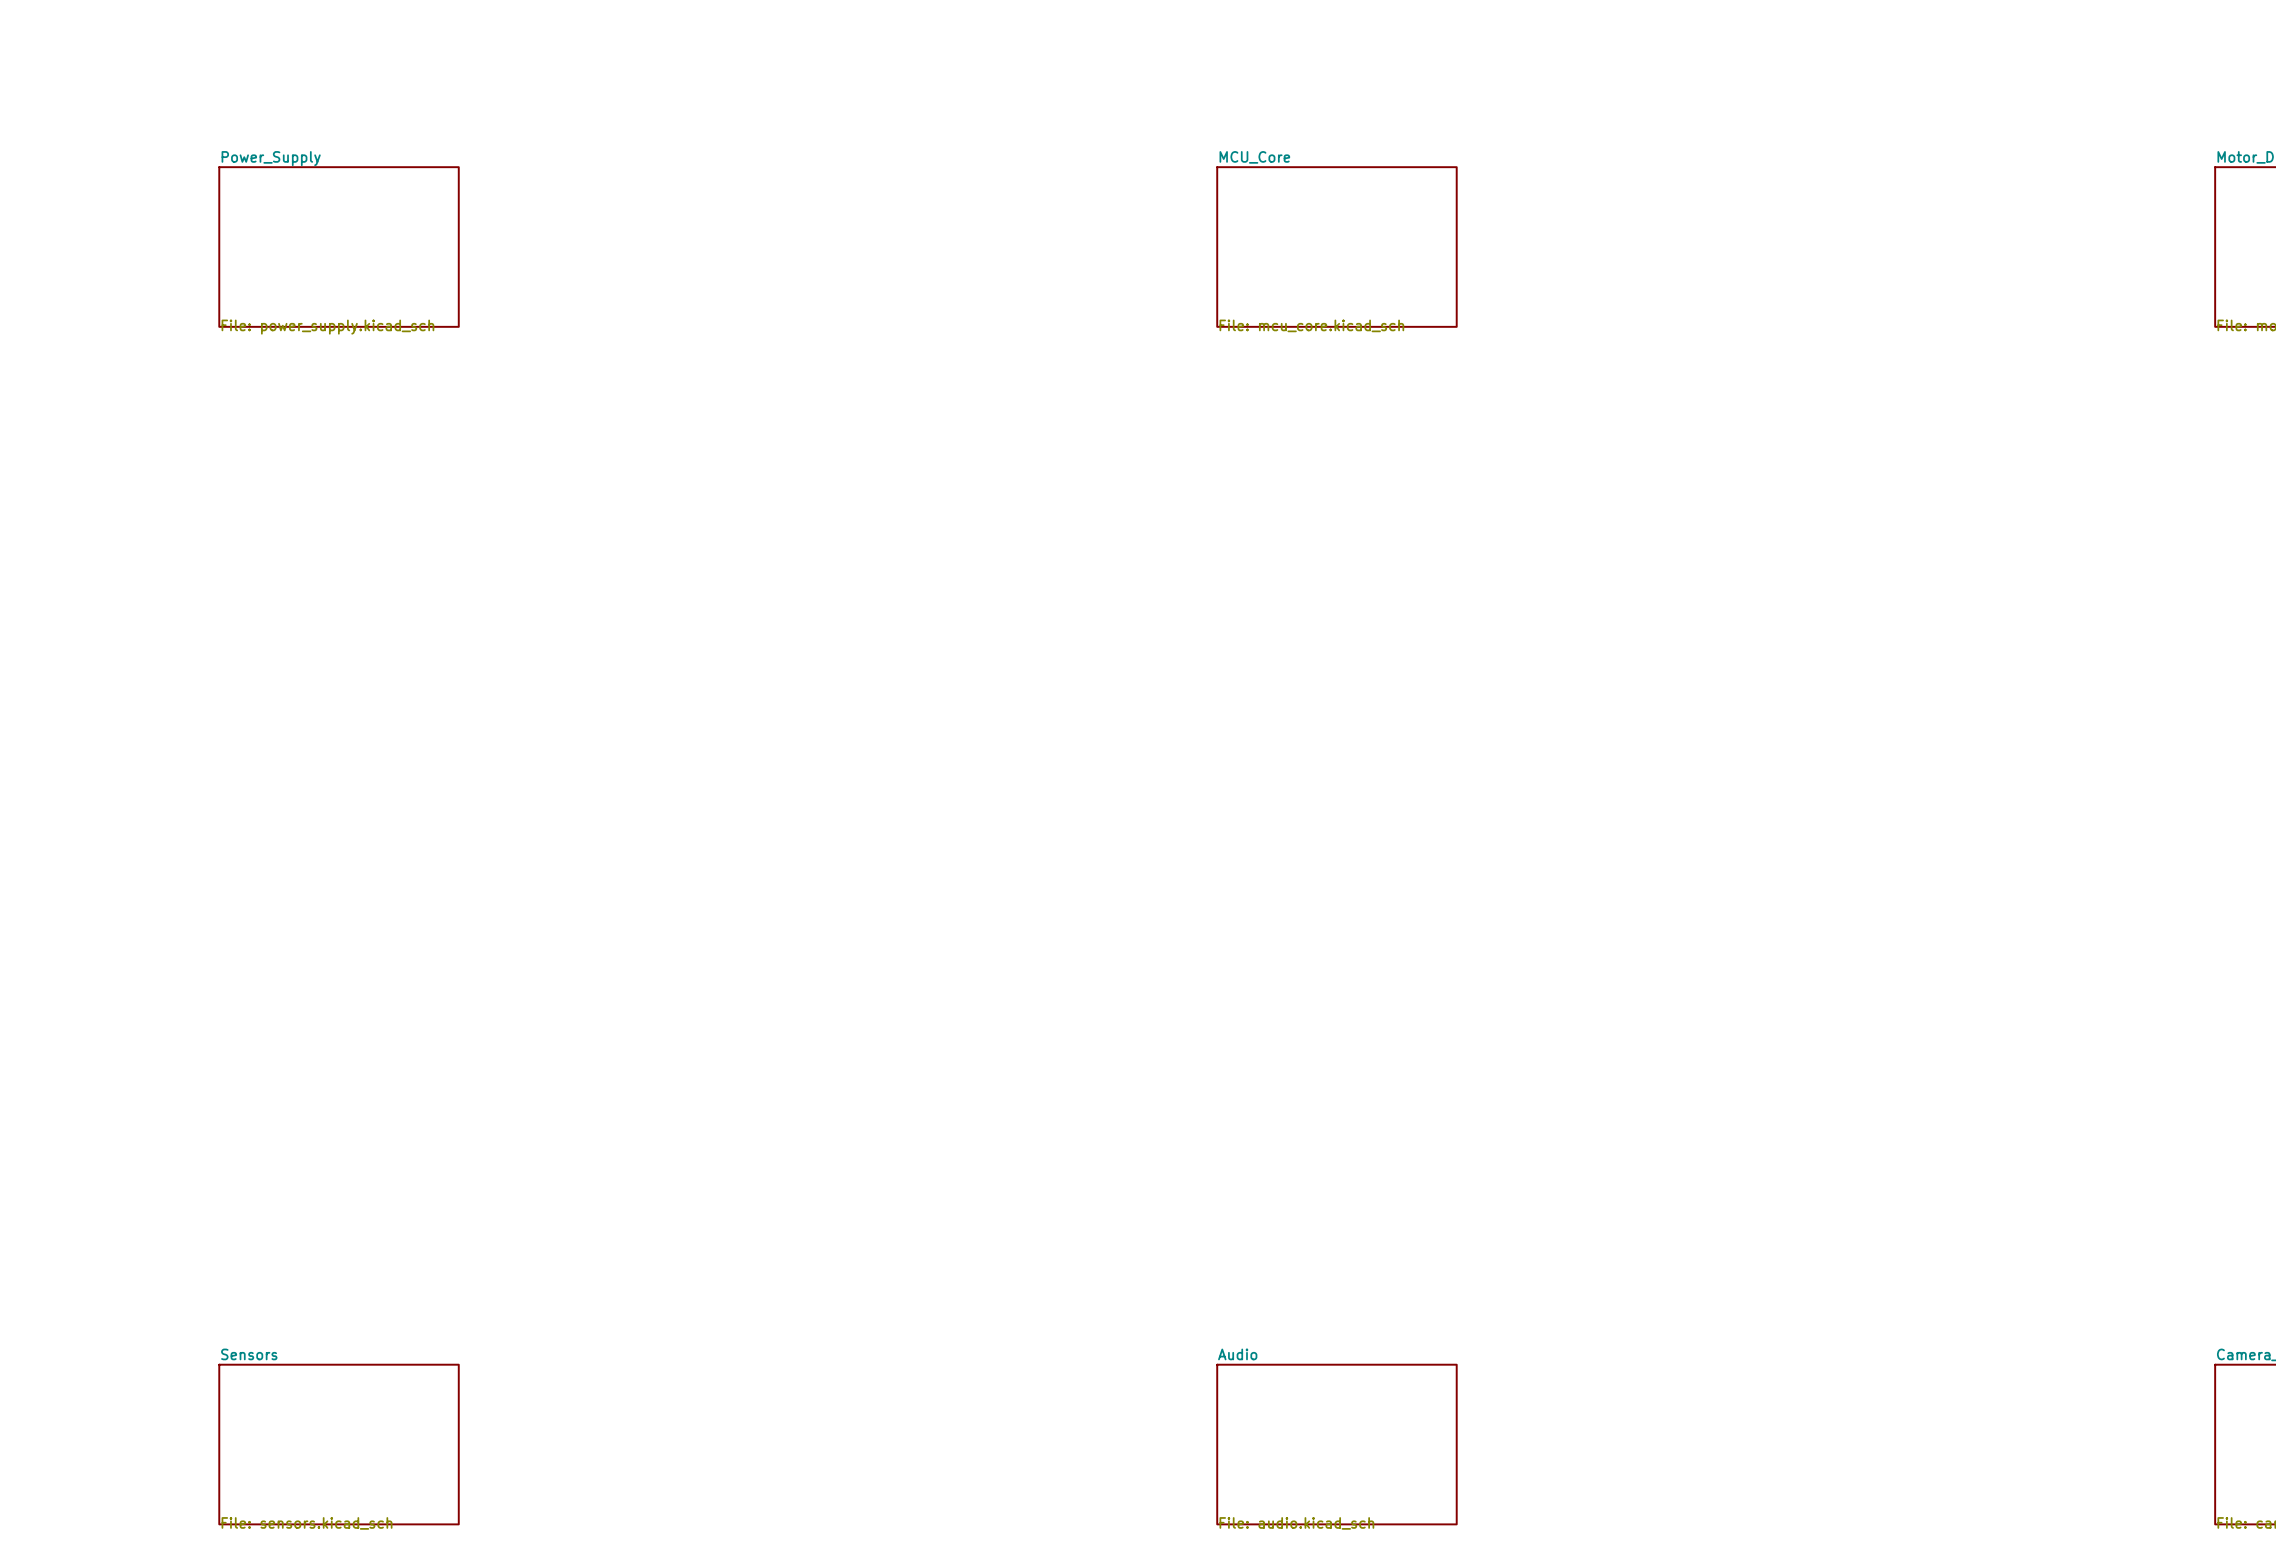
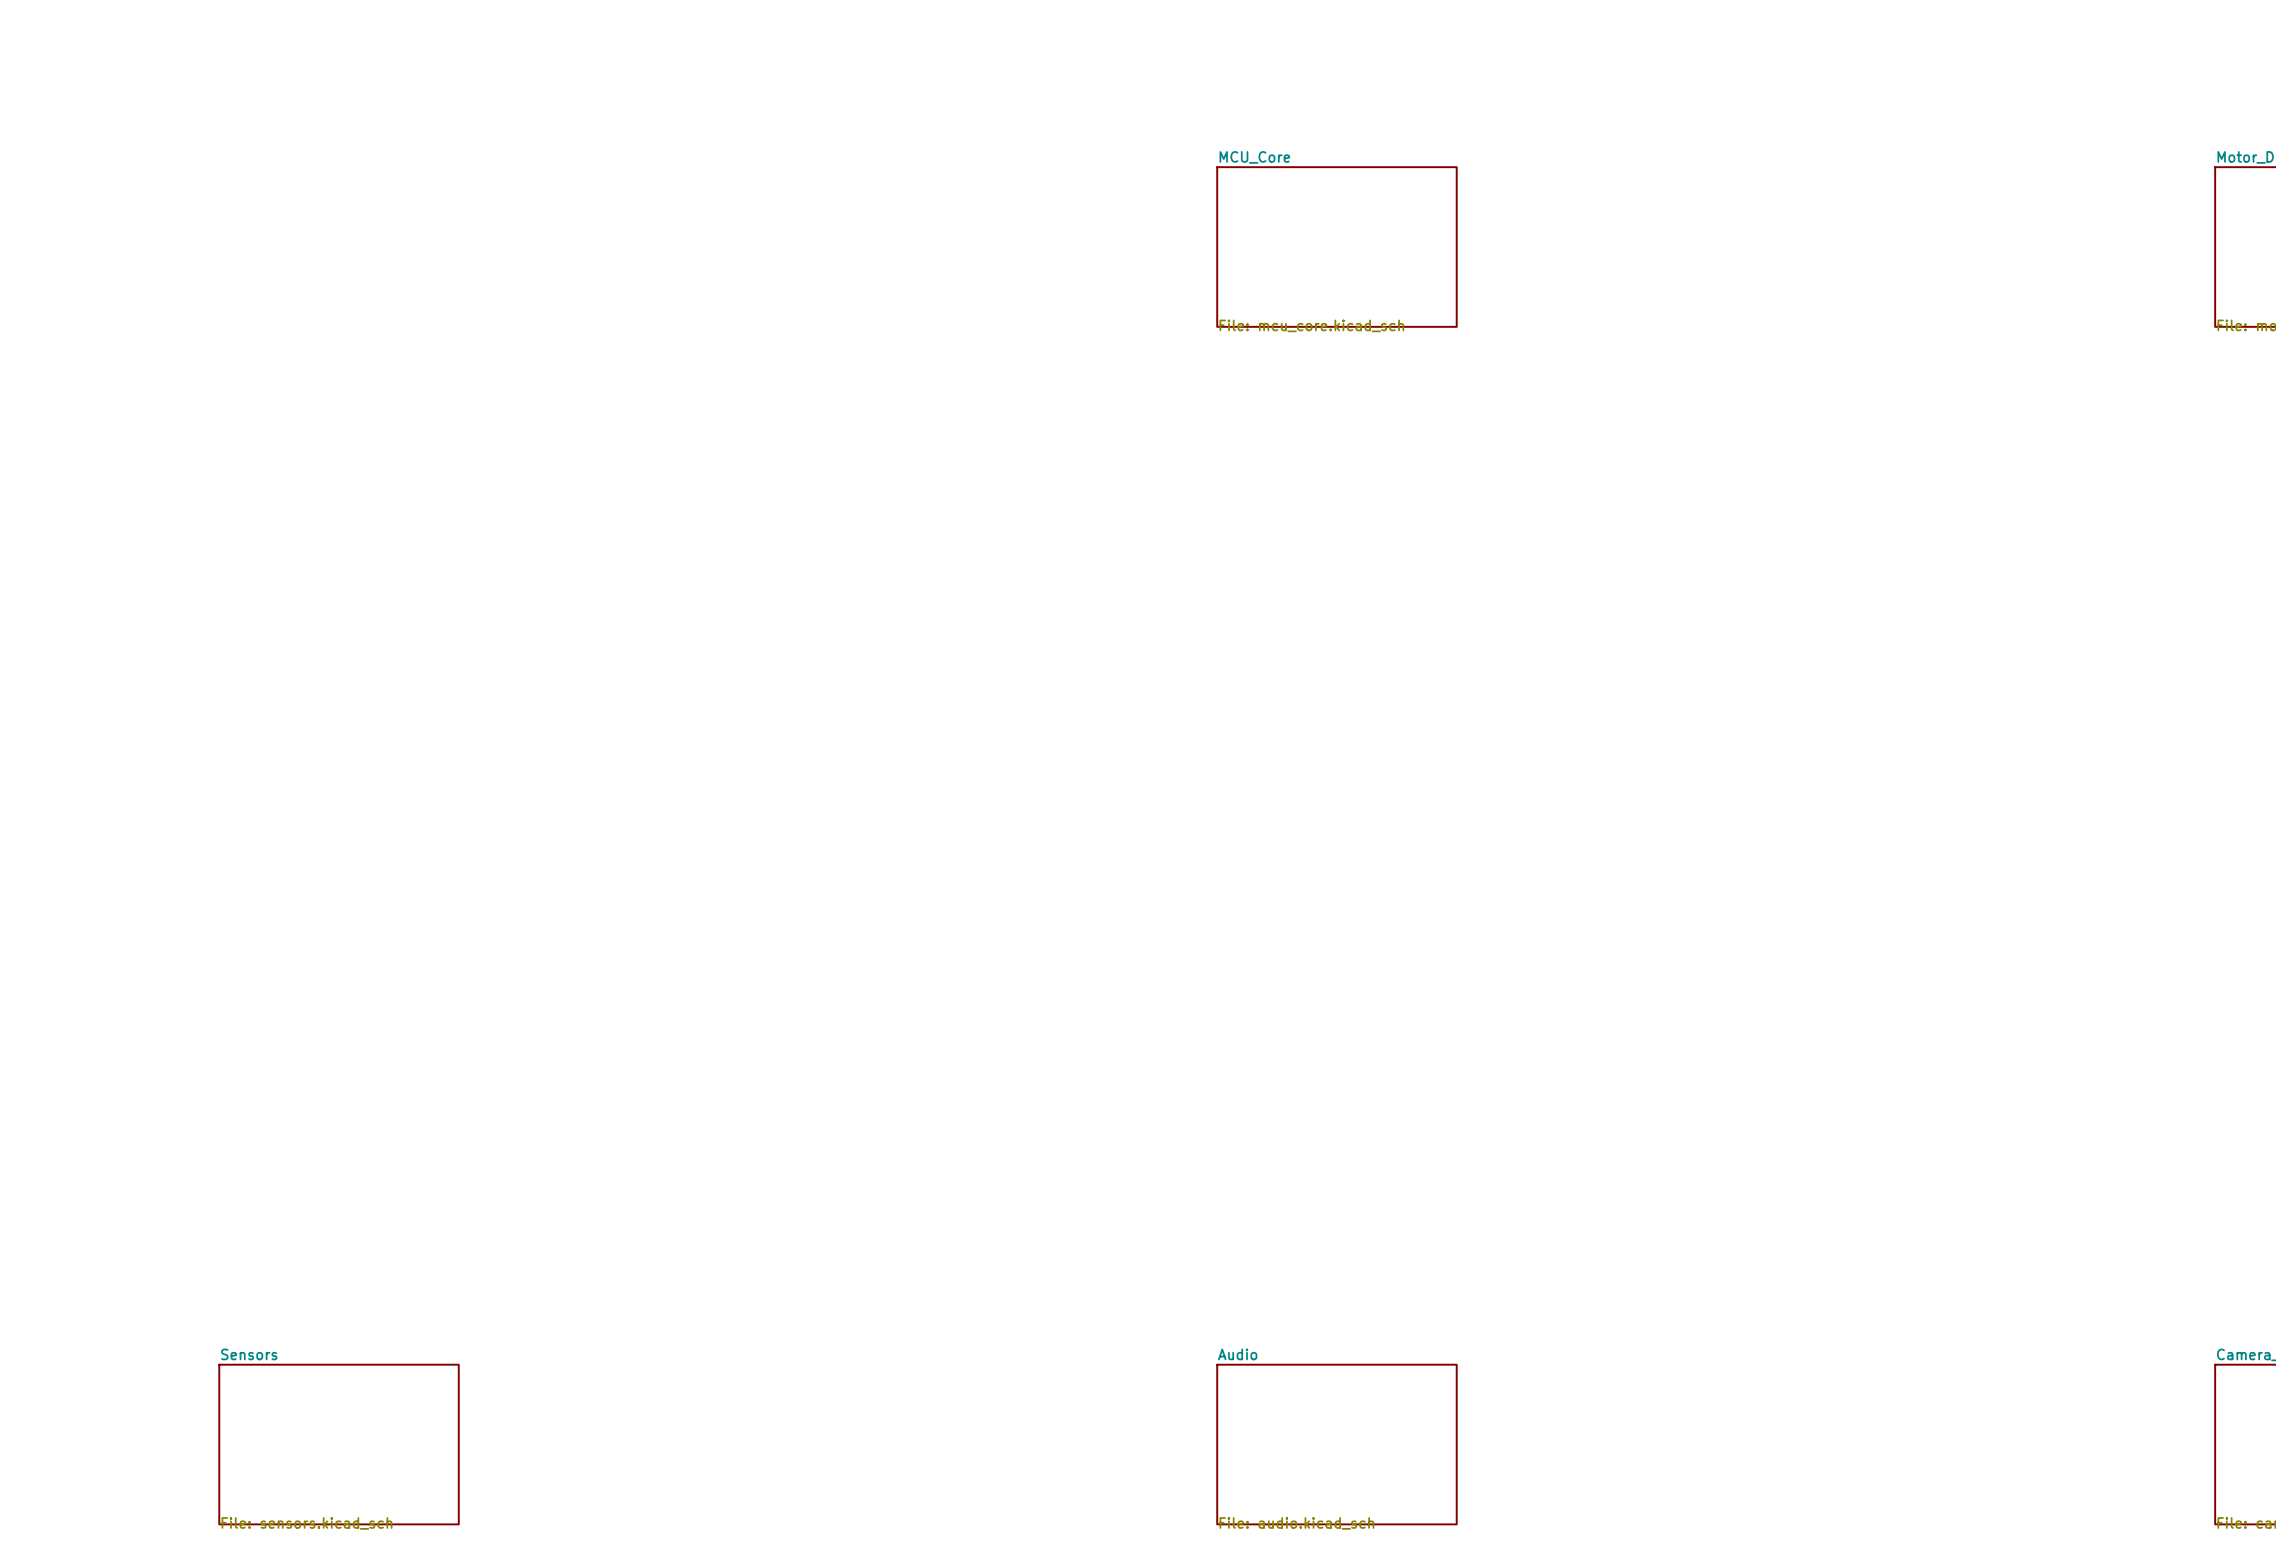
sheet Power_Supply: File: power_supply.kicad_sch (339, 247) -> none

